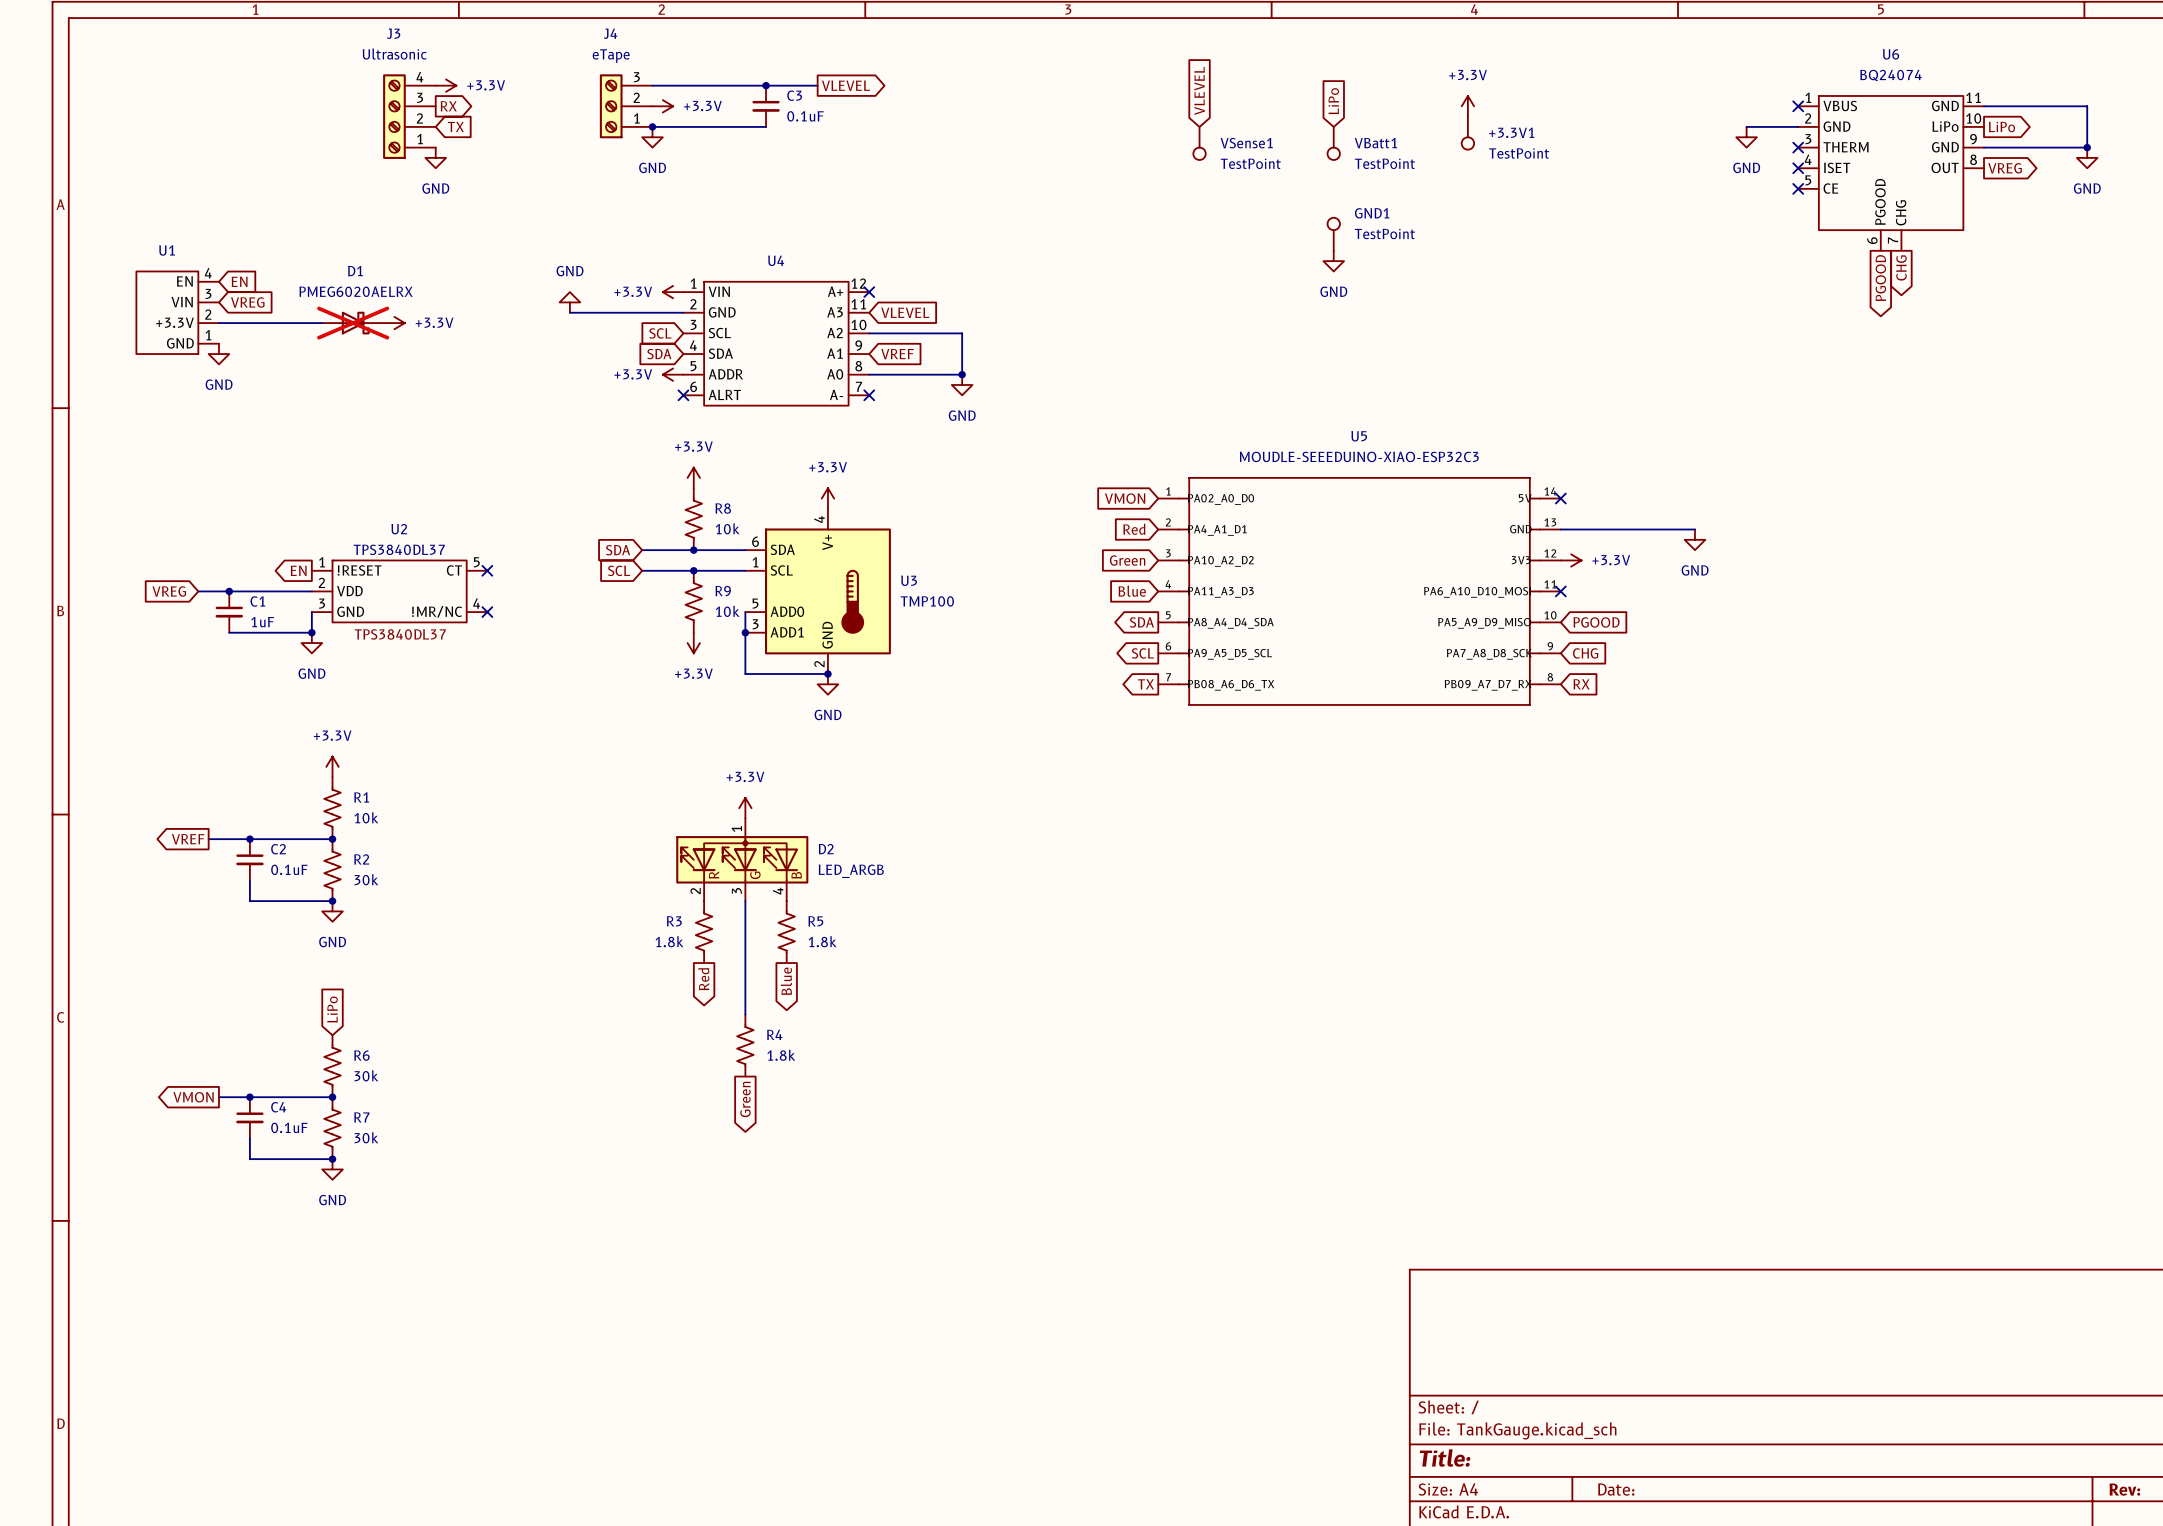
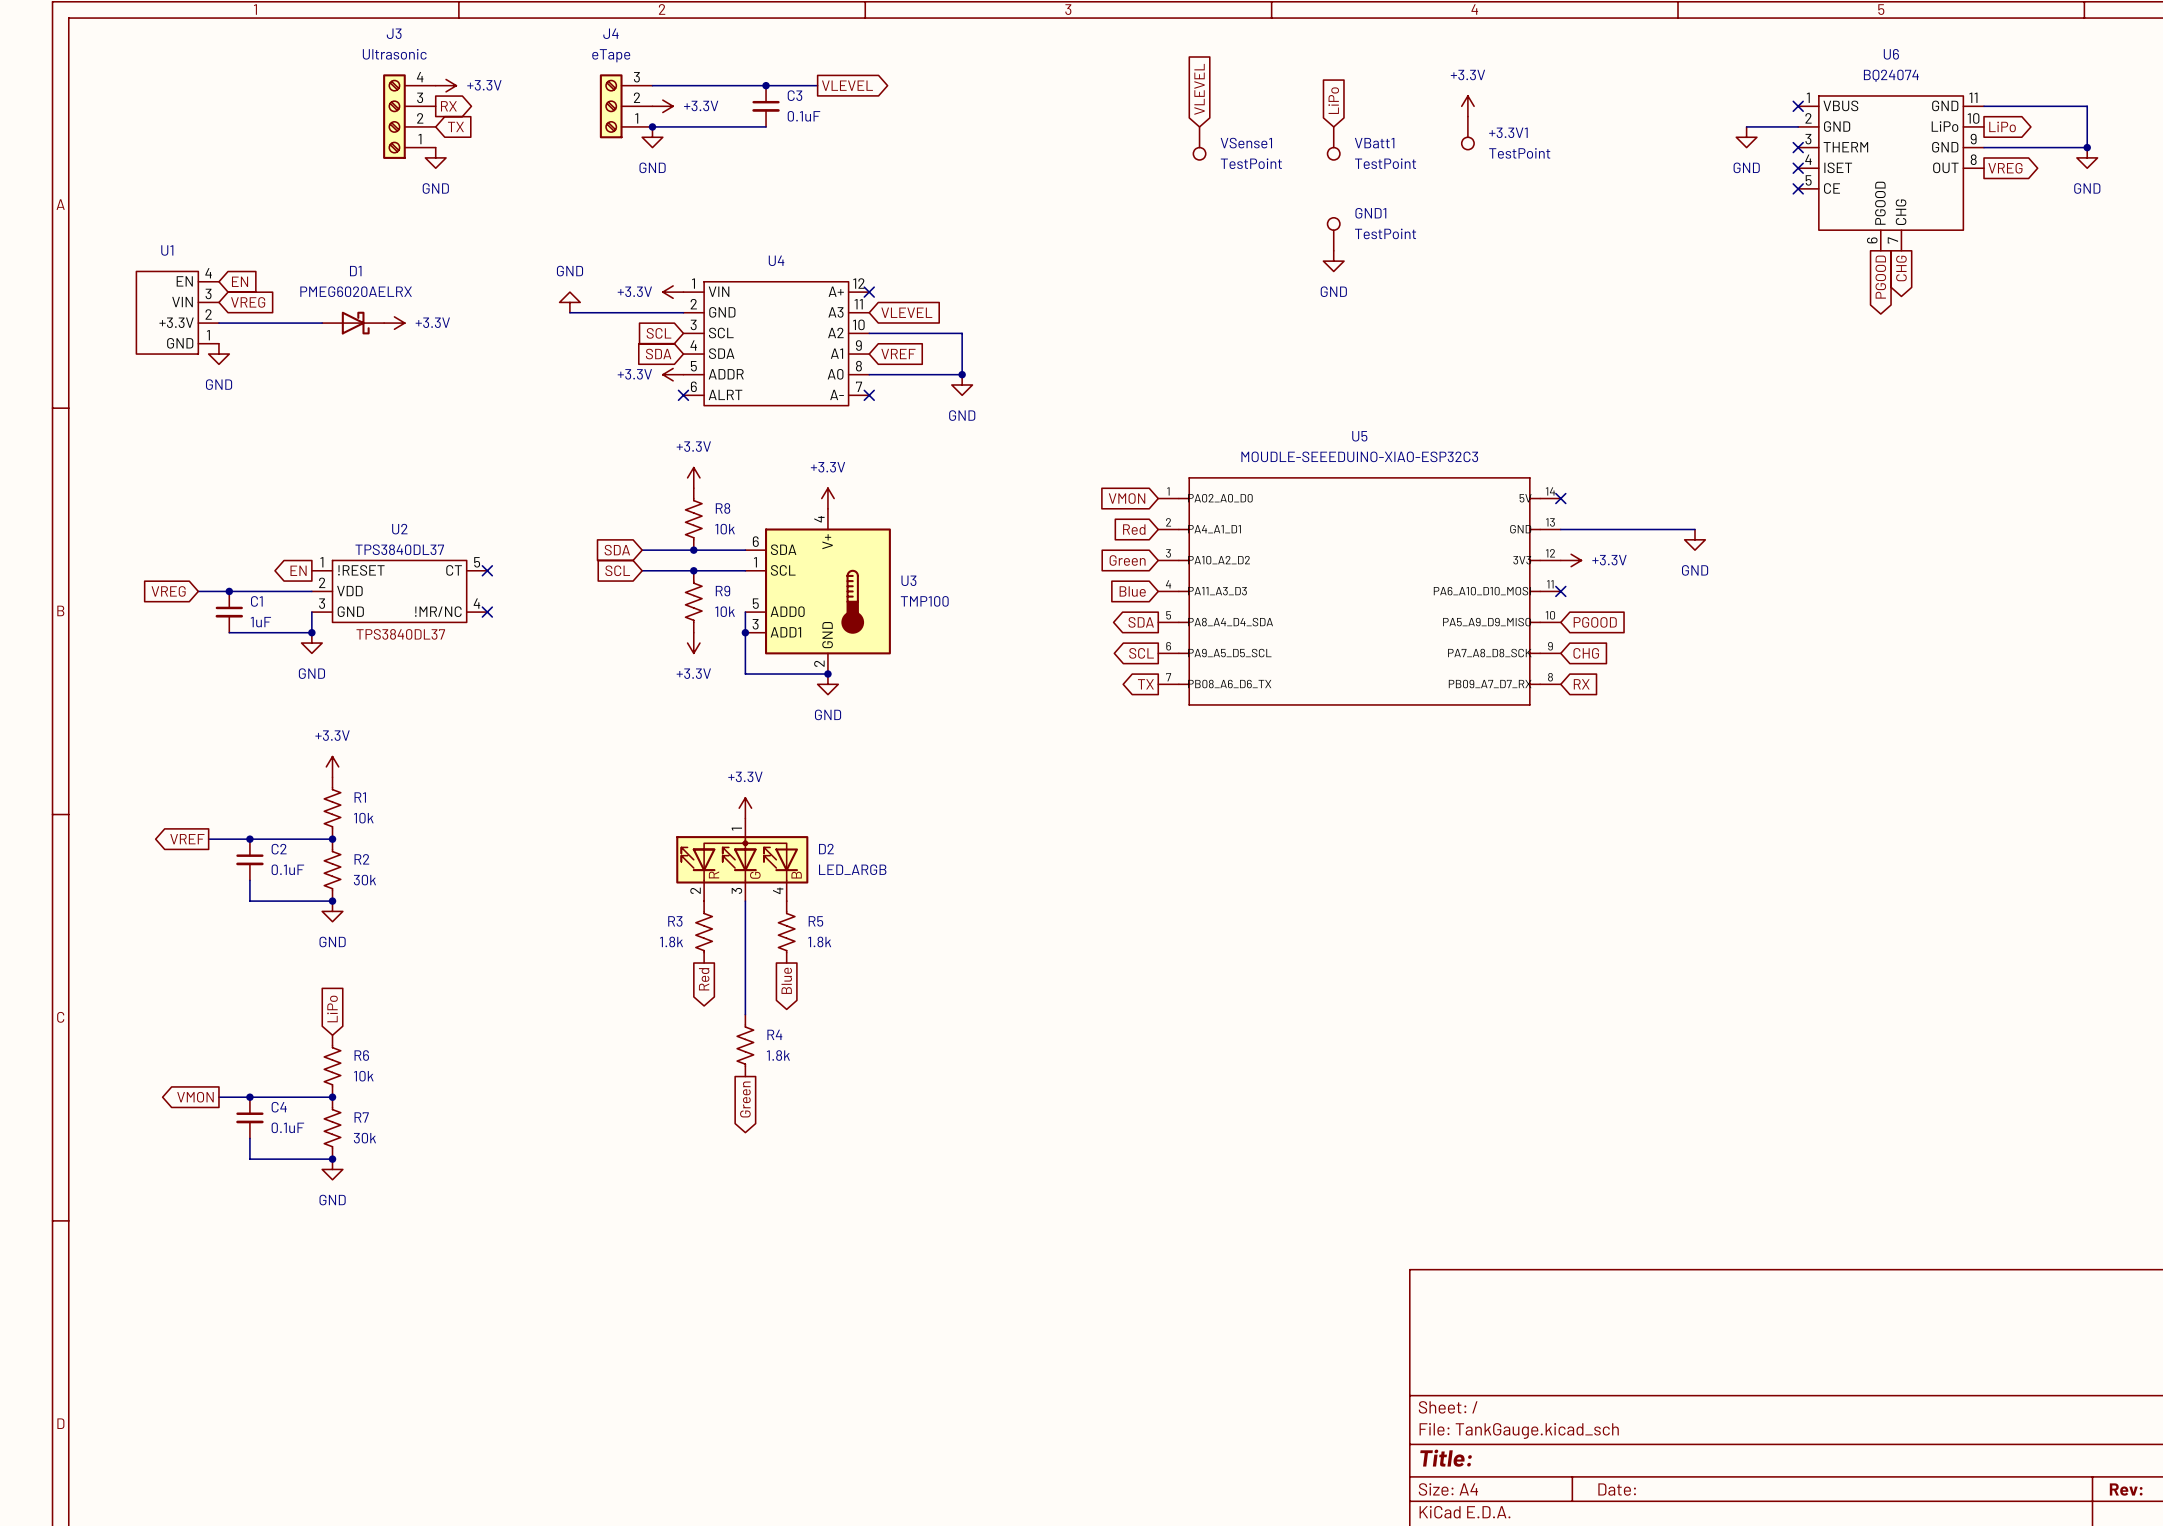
D1 do-not-place cross: (353, 323) -> none
R6 value: 30k (366, 1075) -> 10k (363, 1076)

